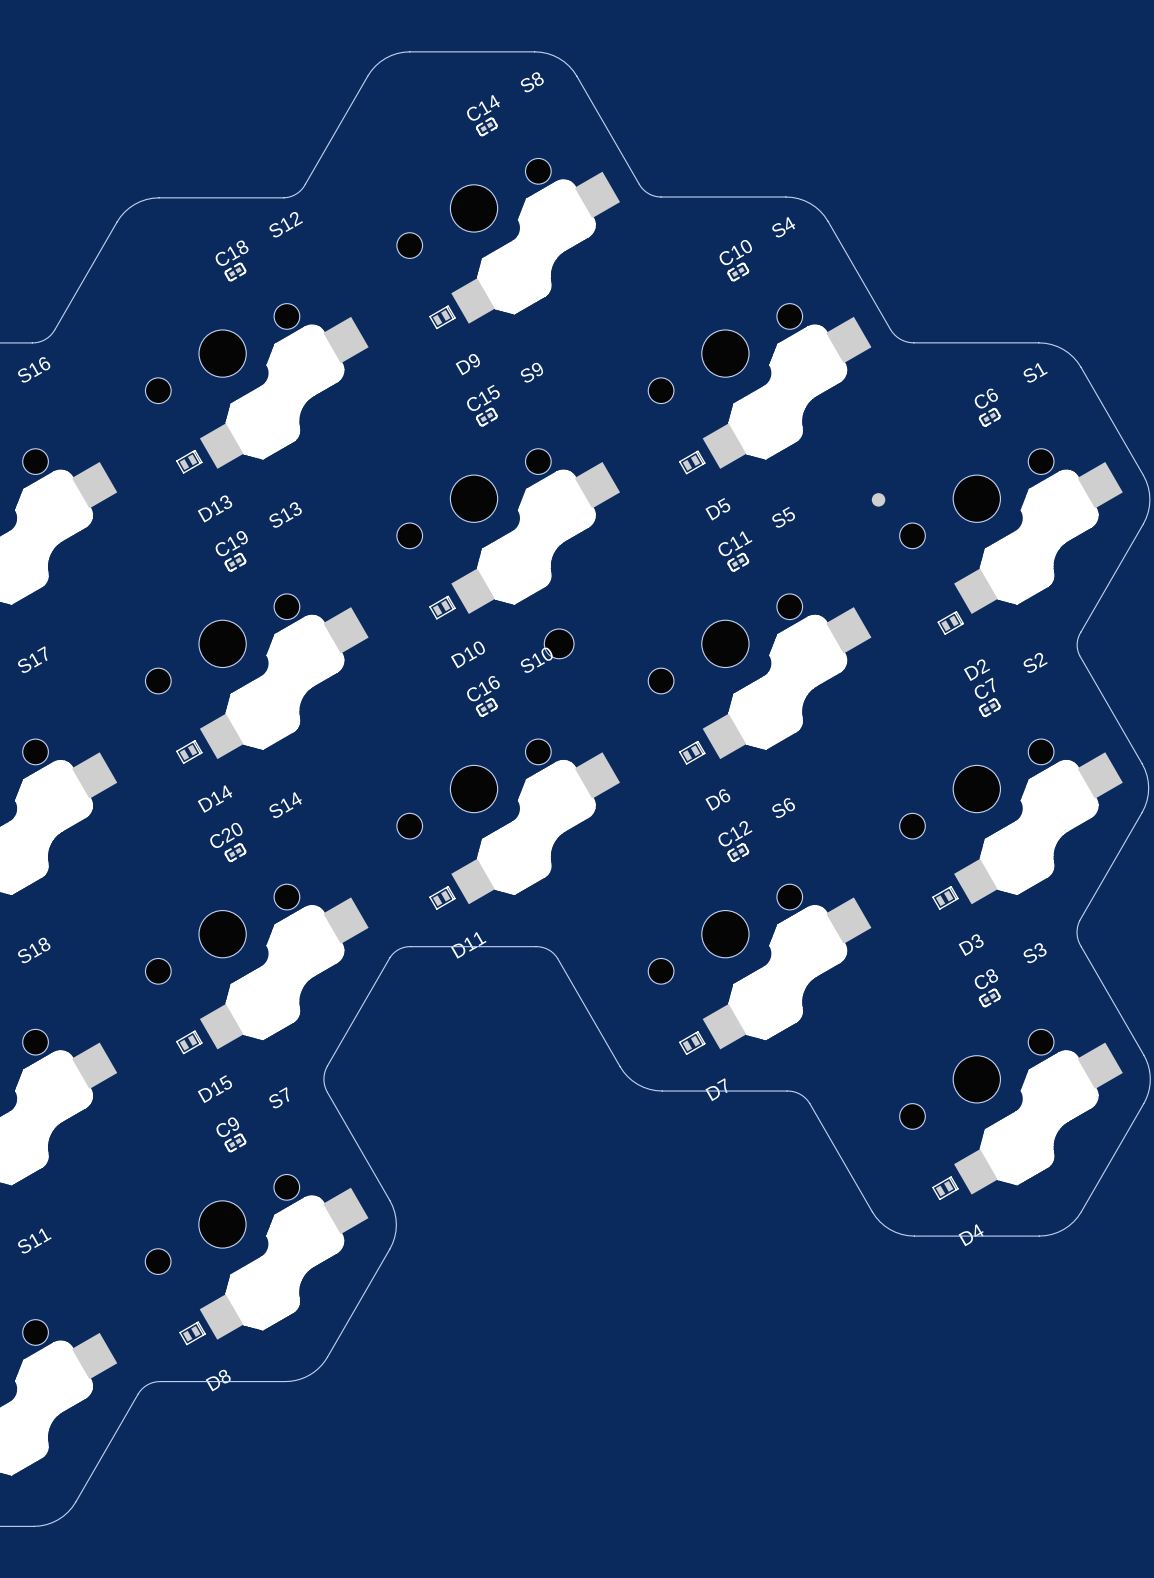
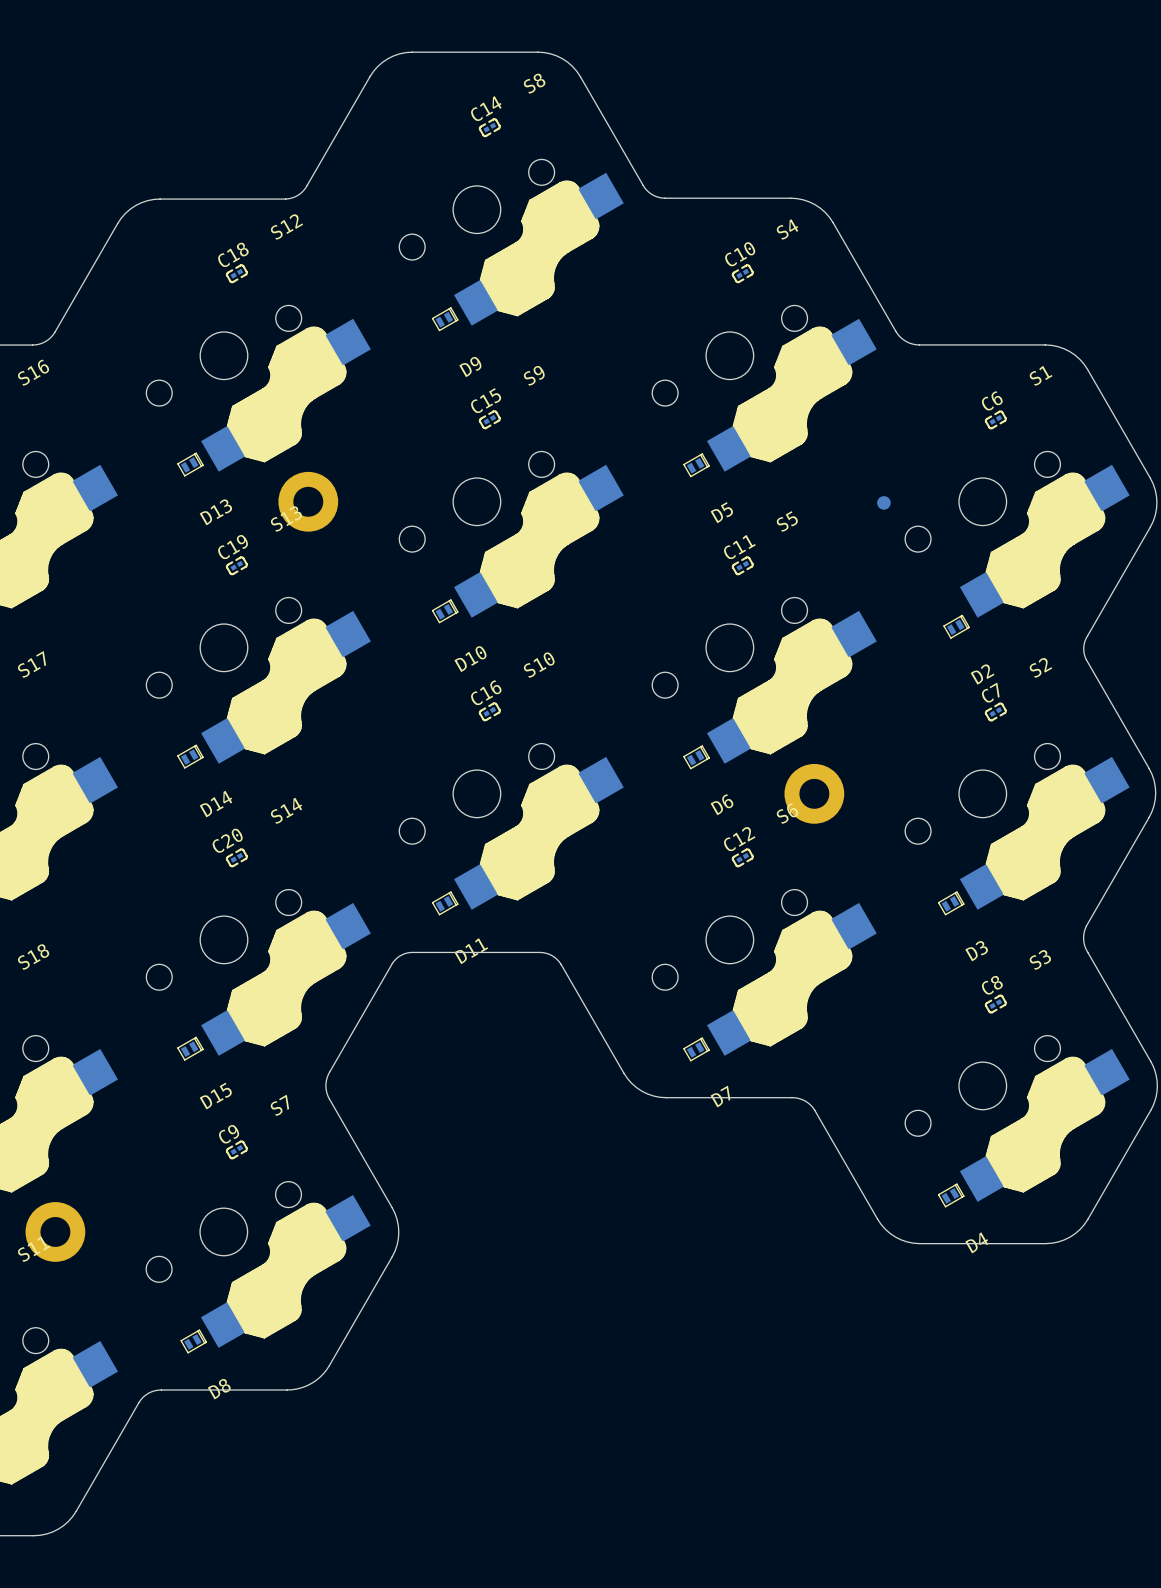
part: none -> (308, 501)
part: (559, 643) -> none
part: none -> (814, 793)
part: none -> (55, 1231)

